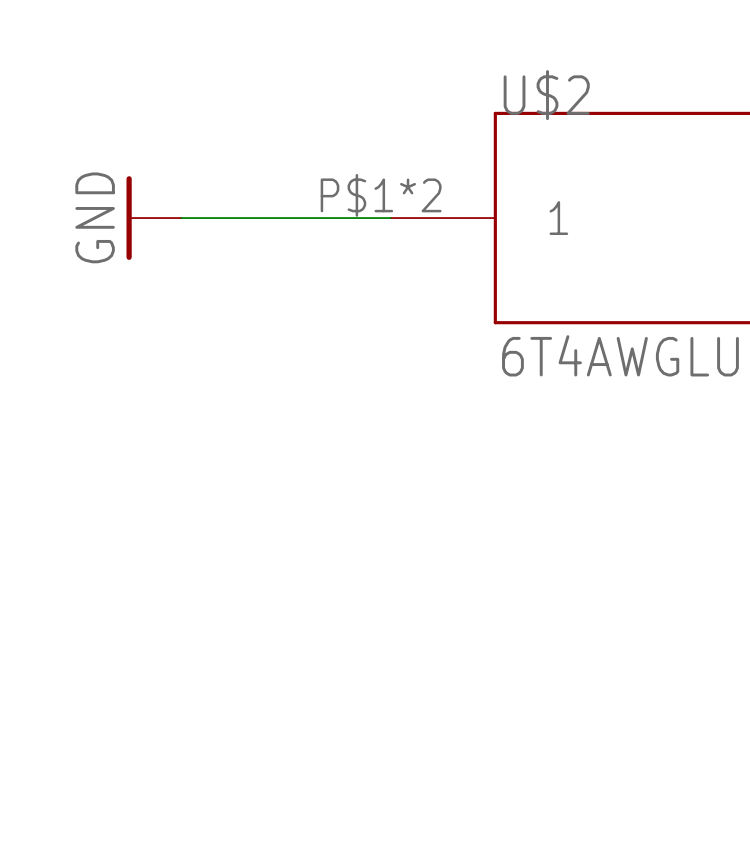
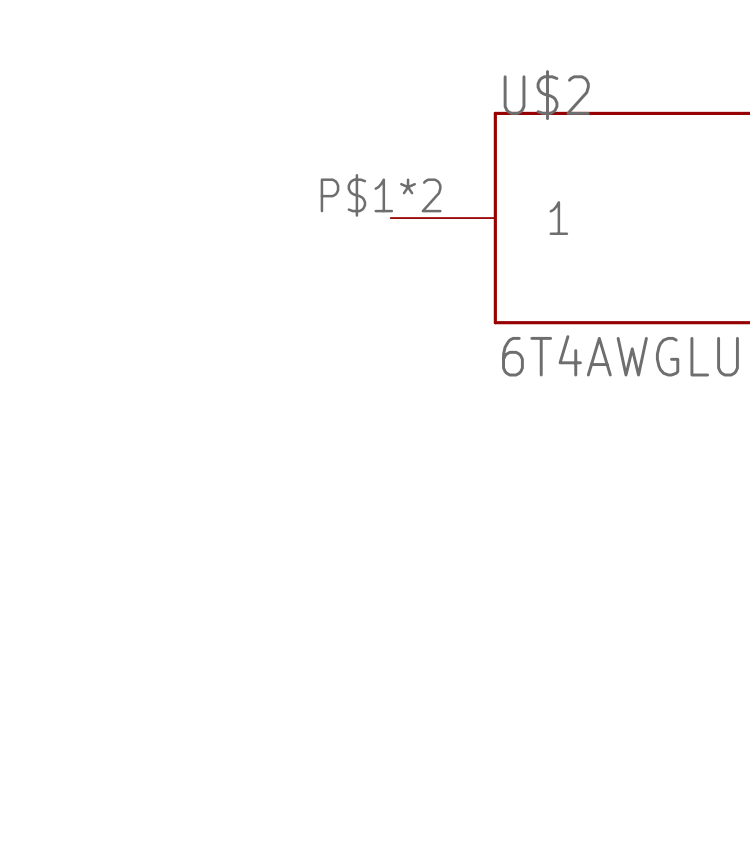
power symbol: GND (153, 218) -> none
wire: (181, 218) (390, 218) -> none

